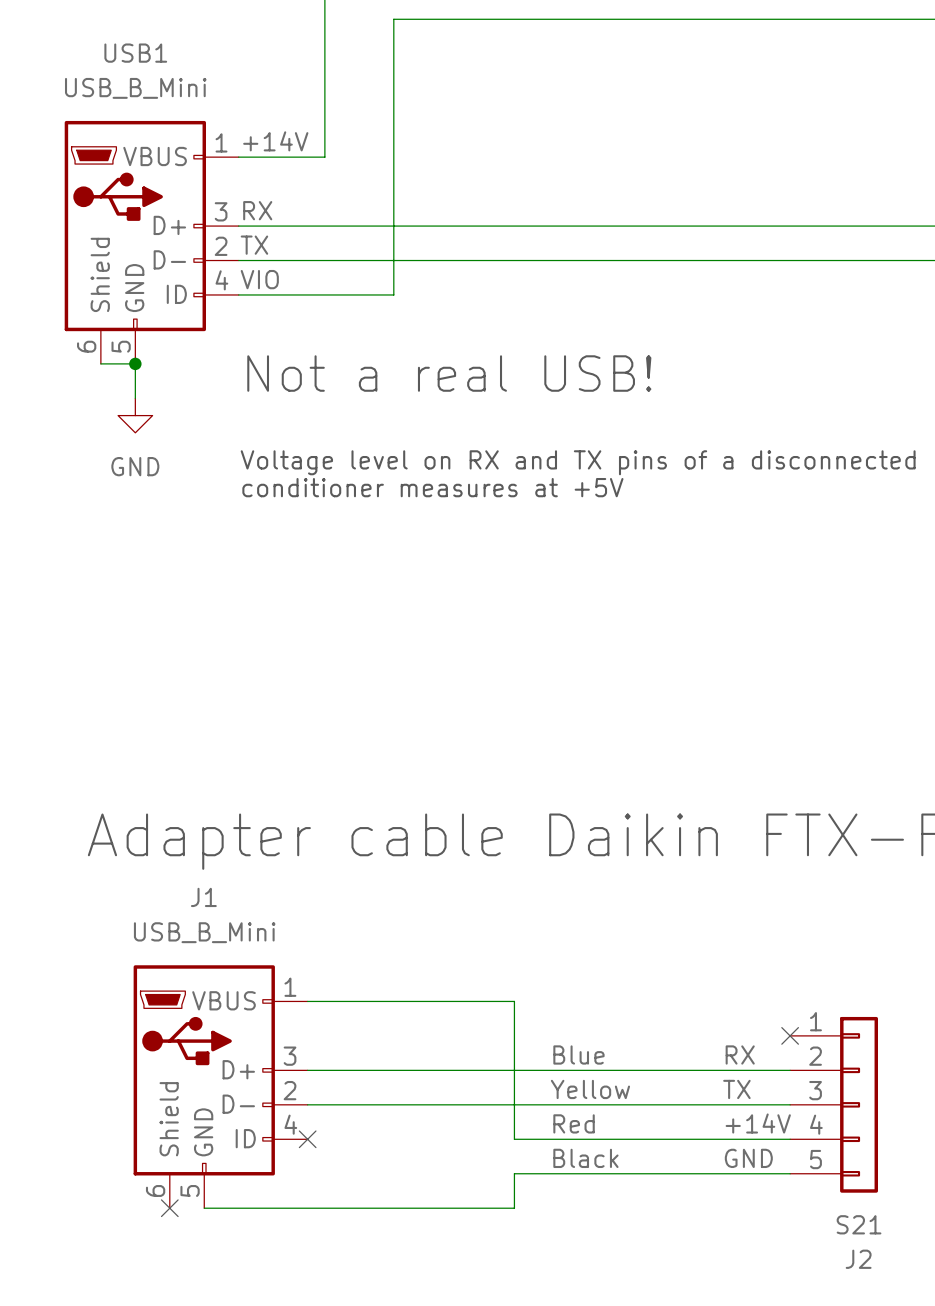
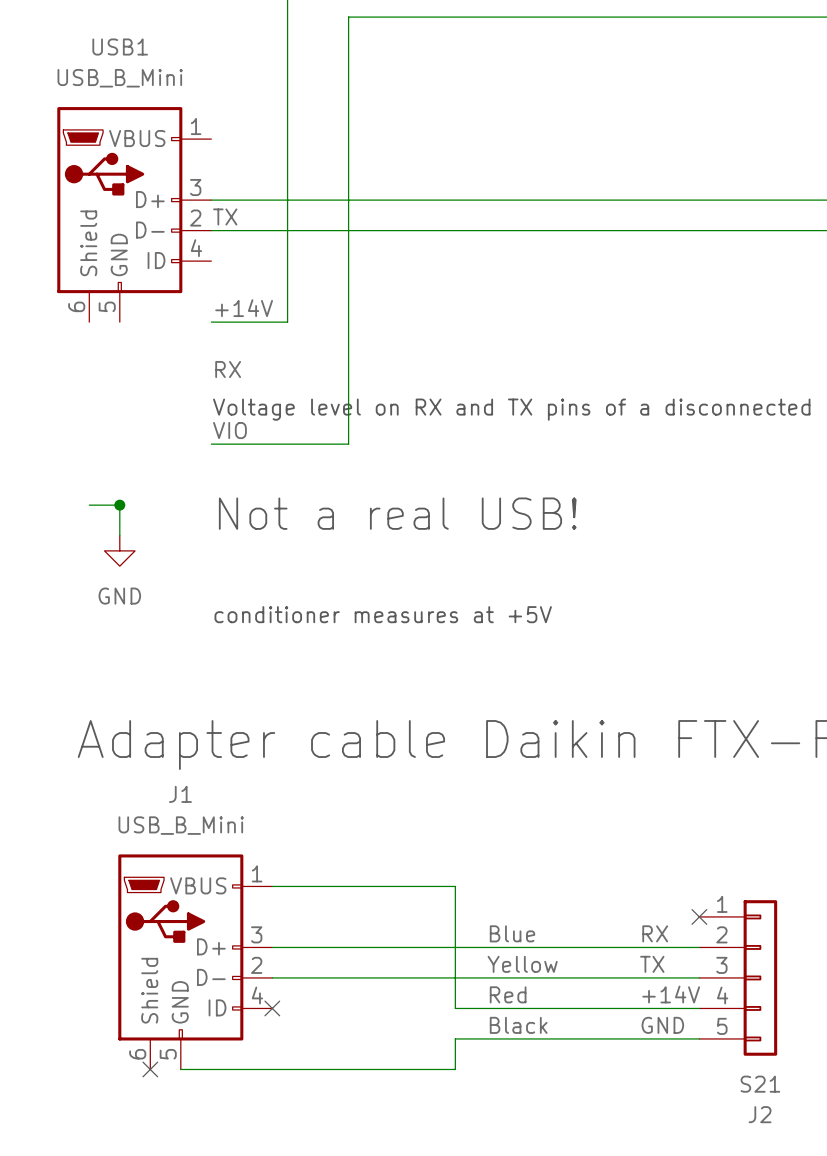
label position: +14V (275, 141) -> +14V (244, 308)
wire: (238, 157) (324, 157) -> (211, 322) (287, 322) (287, 139)
label position: RX (257, 210) -> RX (228, 369)
label position: VIO (259, 279) -> VIO (229, 430)
wire: (238, 294) (393, 294) -> (211, 444) (348, 444) (348, 261)
wire: (100, 363) (135, 363) (135, 398) -> (89, 505) (119, 505) (119, 535)
junction: (135, 363) -> none
text position: Not a real USB! (449, 373) -> Not a real USB! (397, 513)
power symbol position: GND (135, 415) -> GND (119, 550)
text position: conditioner measures at +5V (432, 487) -> conditioner measures at +5V (383, 614)
junction: none -> (119, 505)

